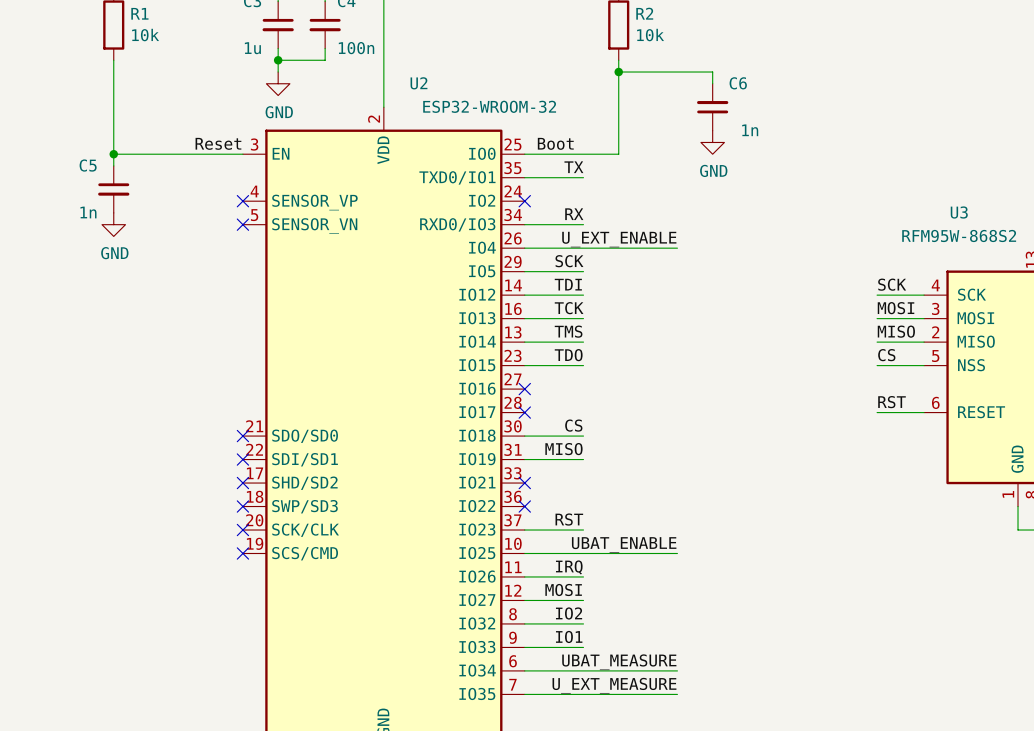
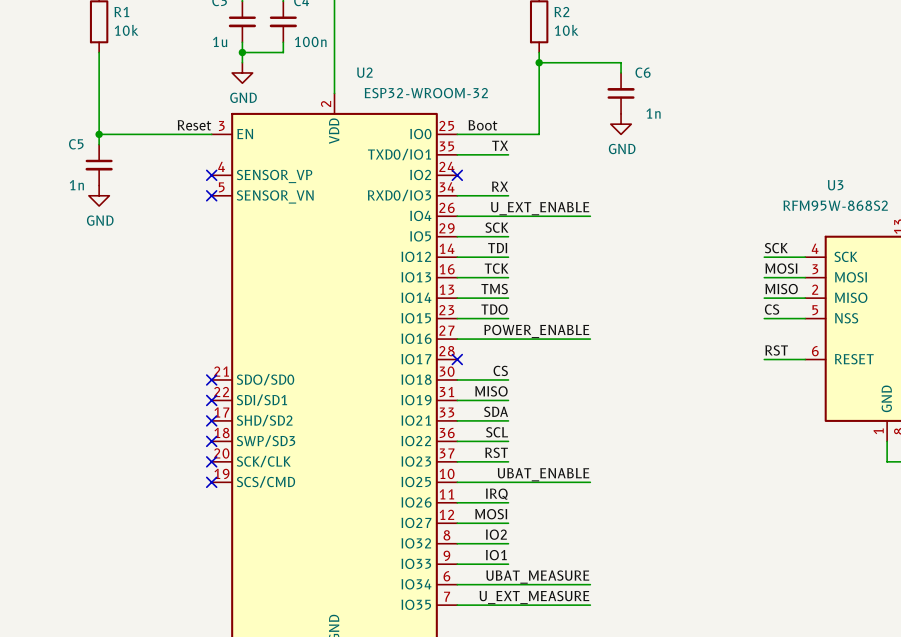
label: none -> POWER_ENABLE (536, 331)
wire: none -> (457, 339) (590, 339)
no-connect mark: (524, 389) -> none
label: none -> SDA (496, 411)
wire: none -> (457, 420) (508, 420)
no-connect mark: (524, 483) -> none
label: none -> SCL (497, 432)
wire: none -> (457, 441) (508, 441)
no-connect mark: (524, 506) -> none

